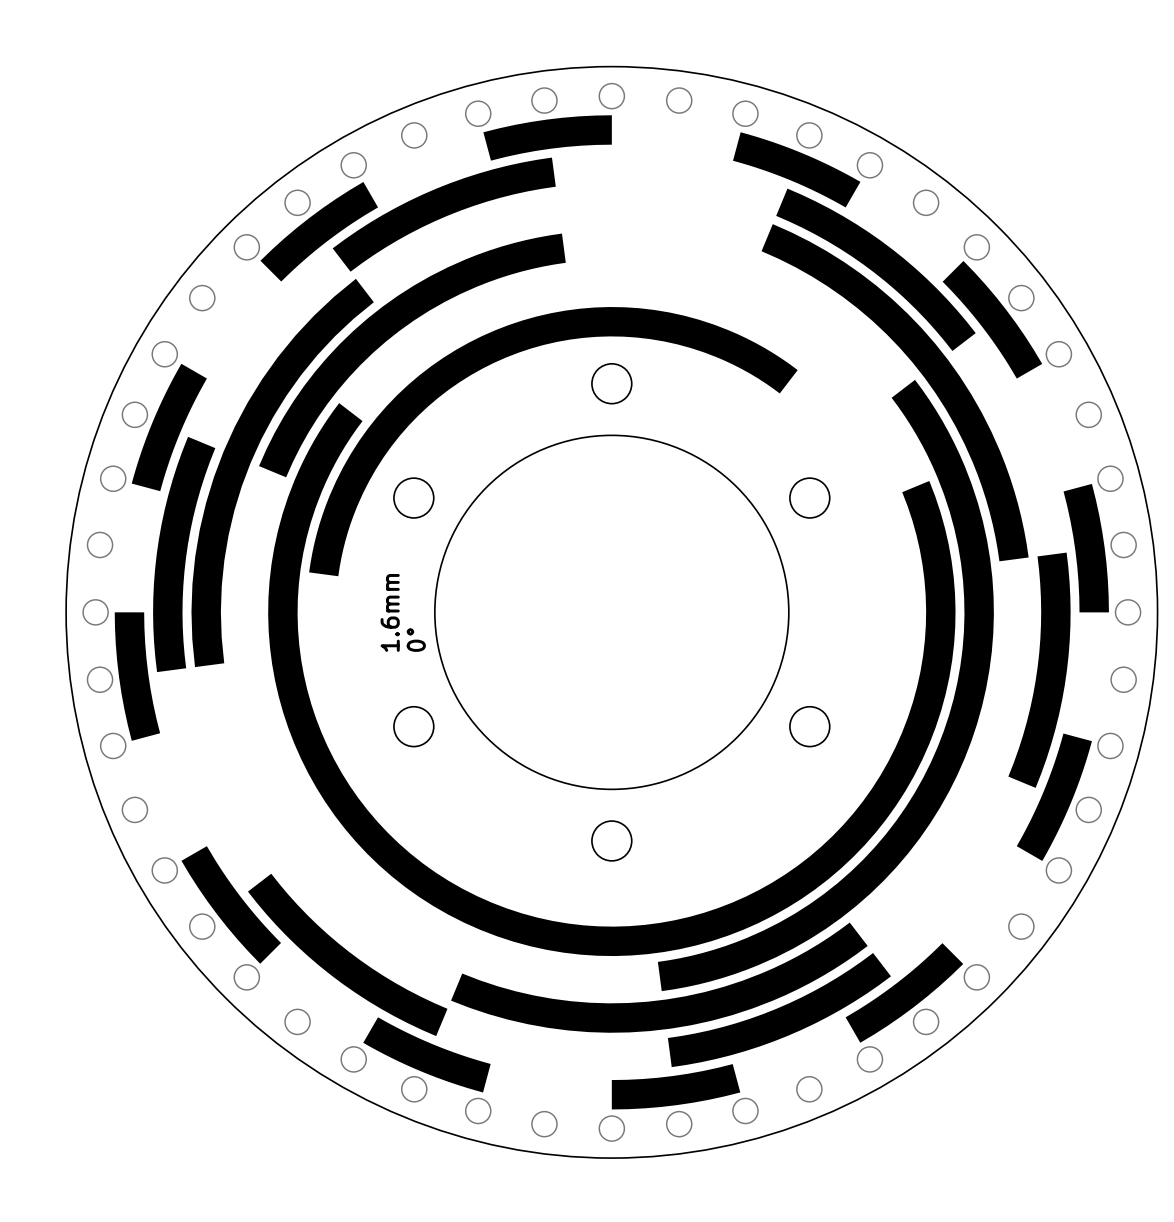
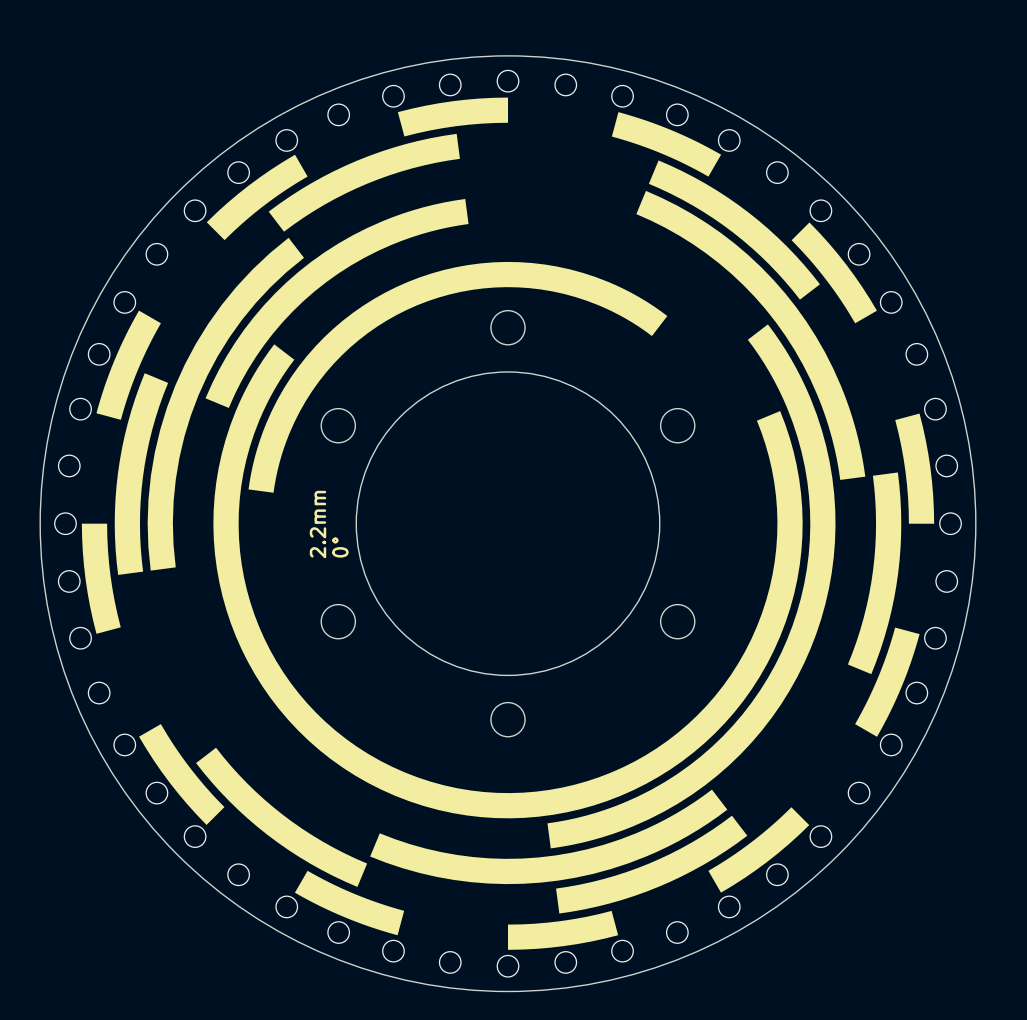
text: 1.6mm (390, 612) -> 2.2mm (317, 524)

